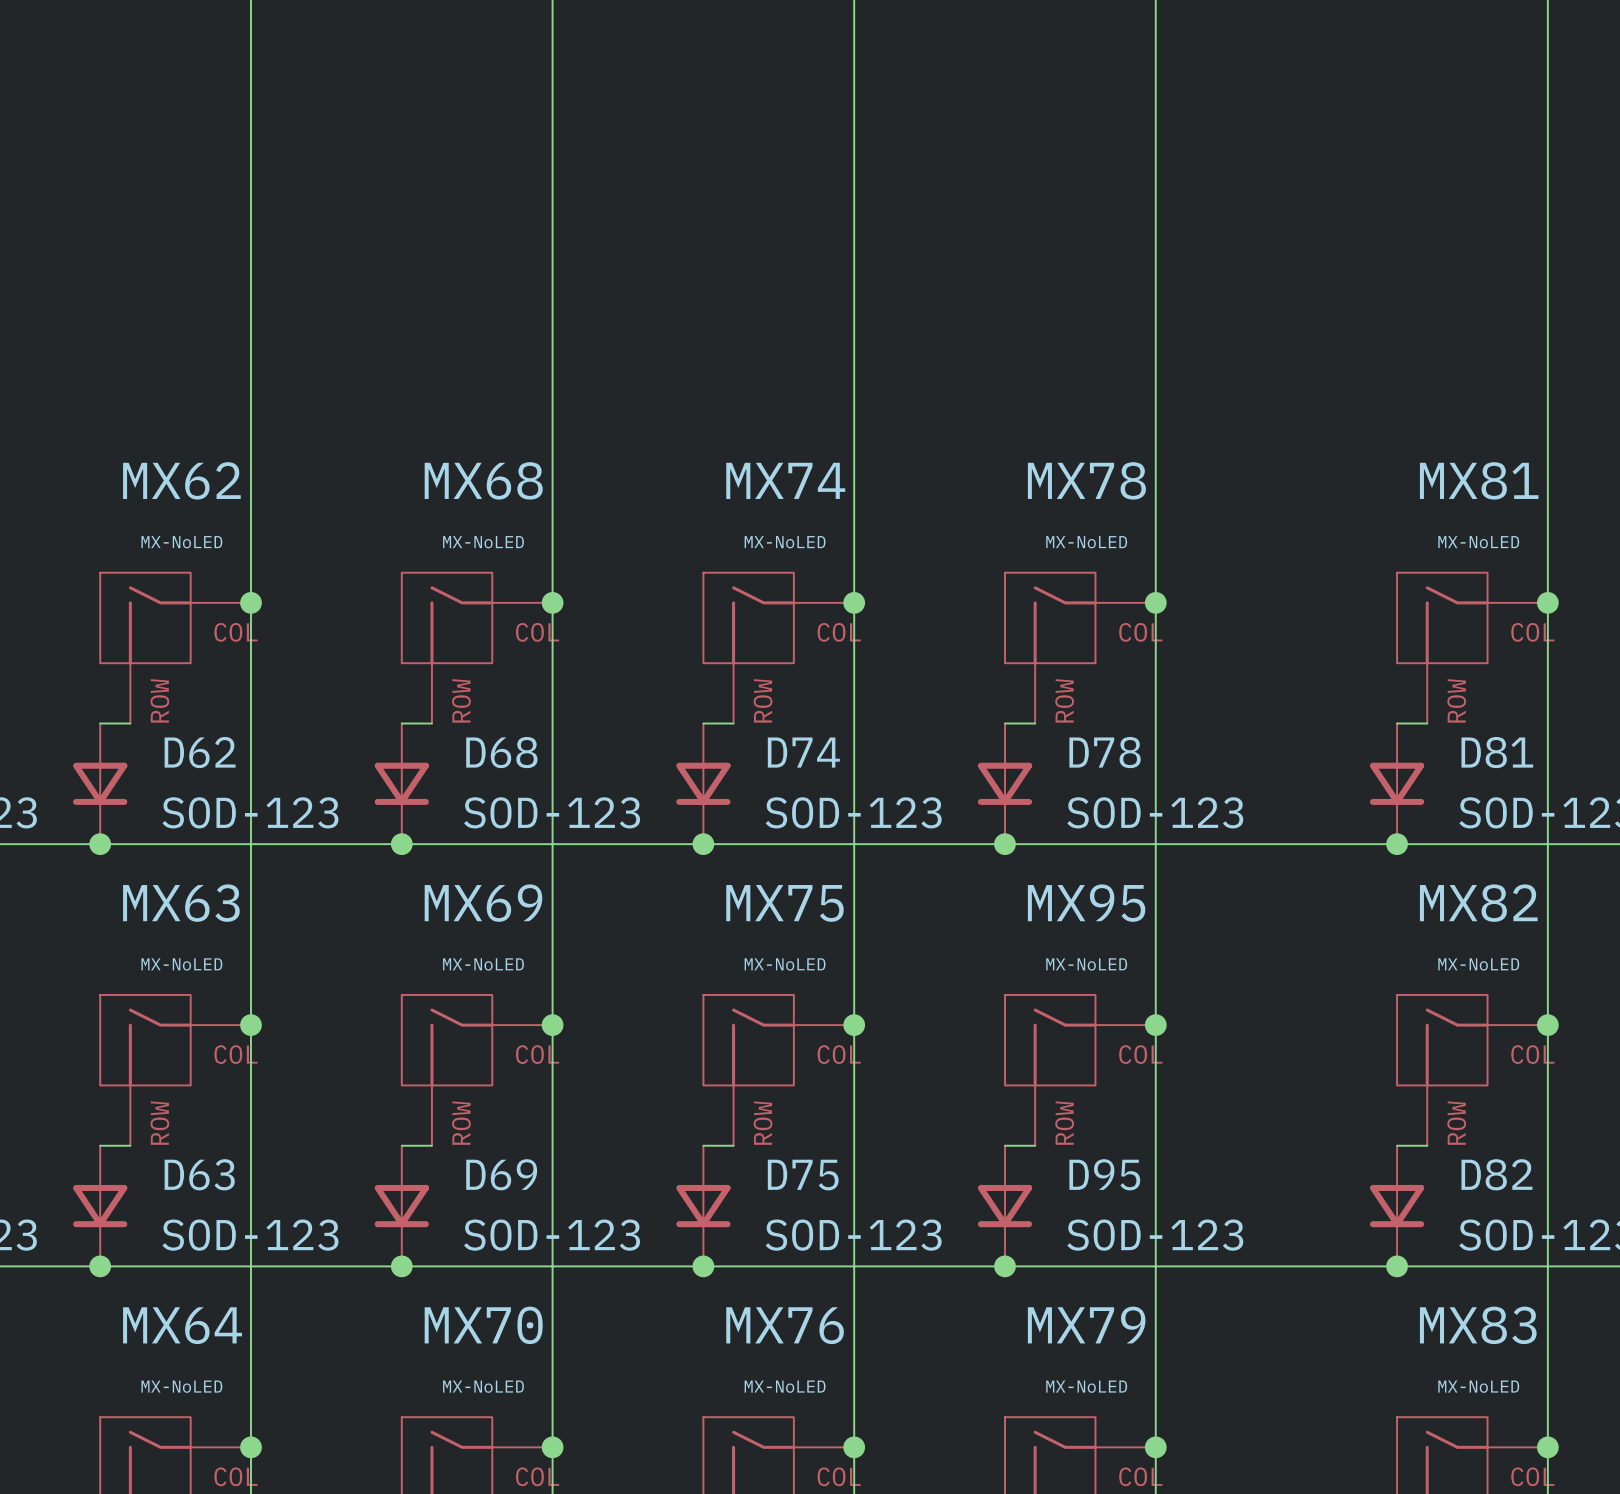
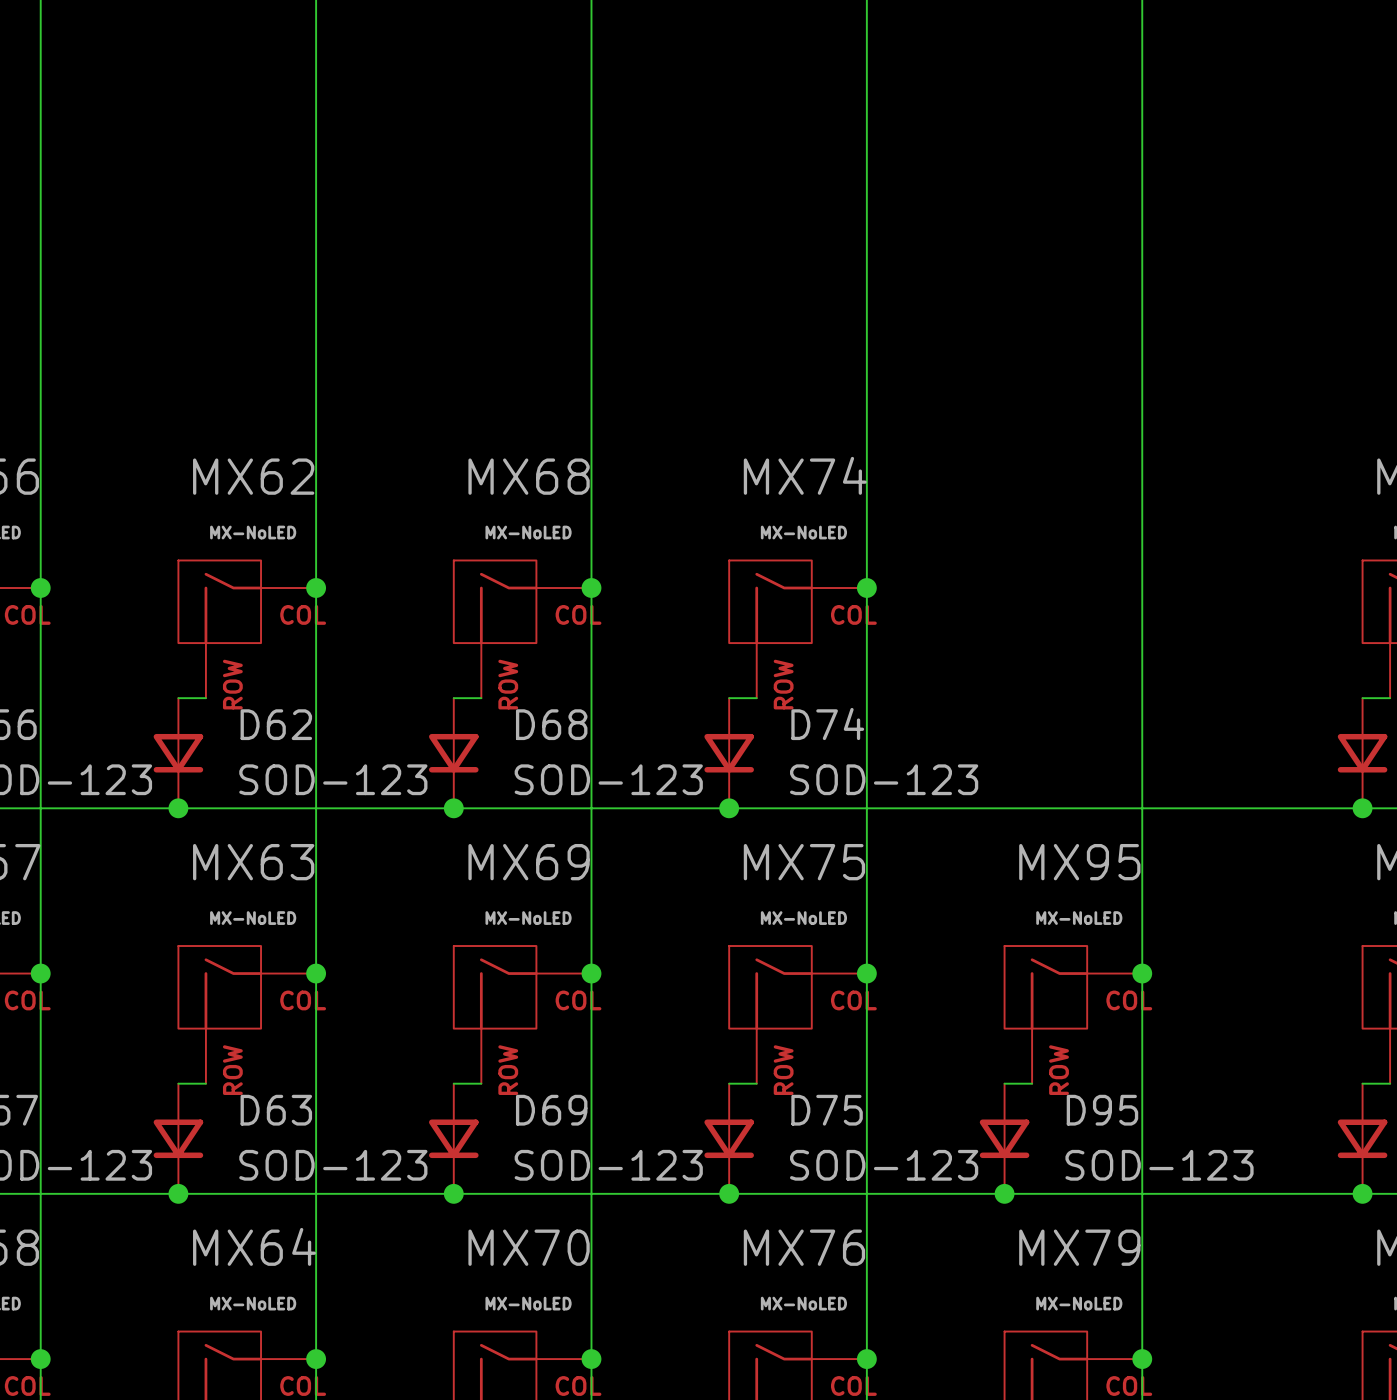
junction: (1155, 602) -> none
MX78: MX-NoLED (1080, 648) -> none
wire: (1004, 723) (1035, 723) -> none
D78: SOD-123 (1004, 783) -> none
junction: (1004, 844) -> none

